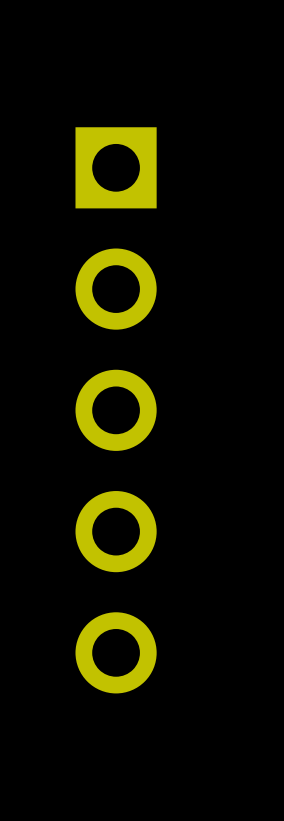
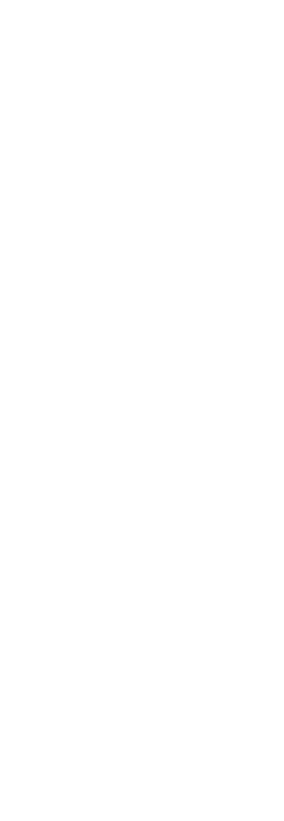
part: (116, 410) -> none

